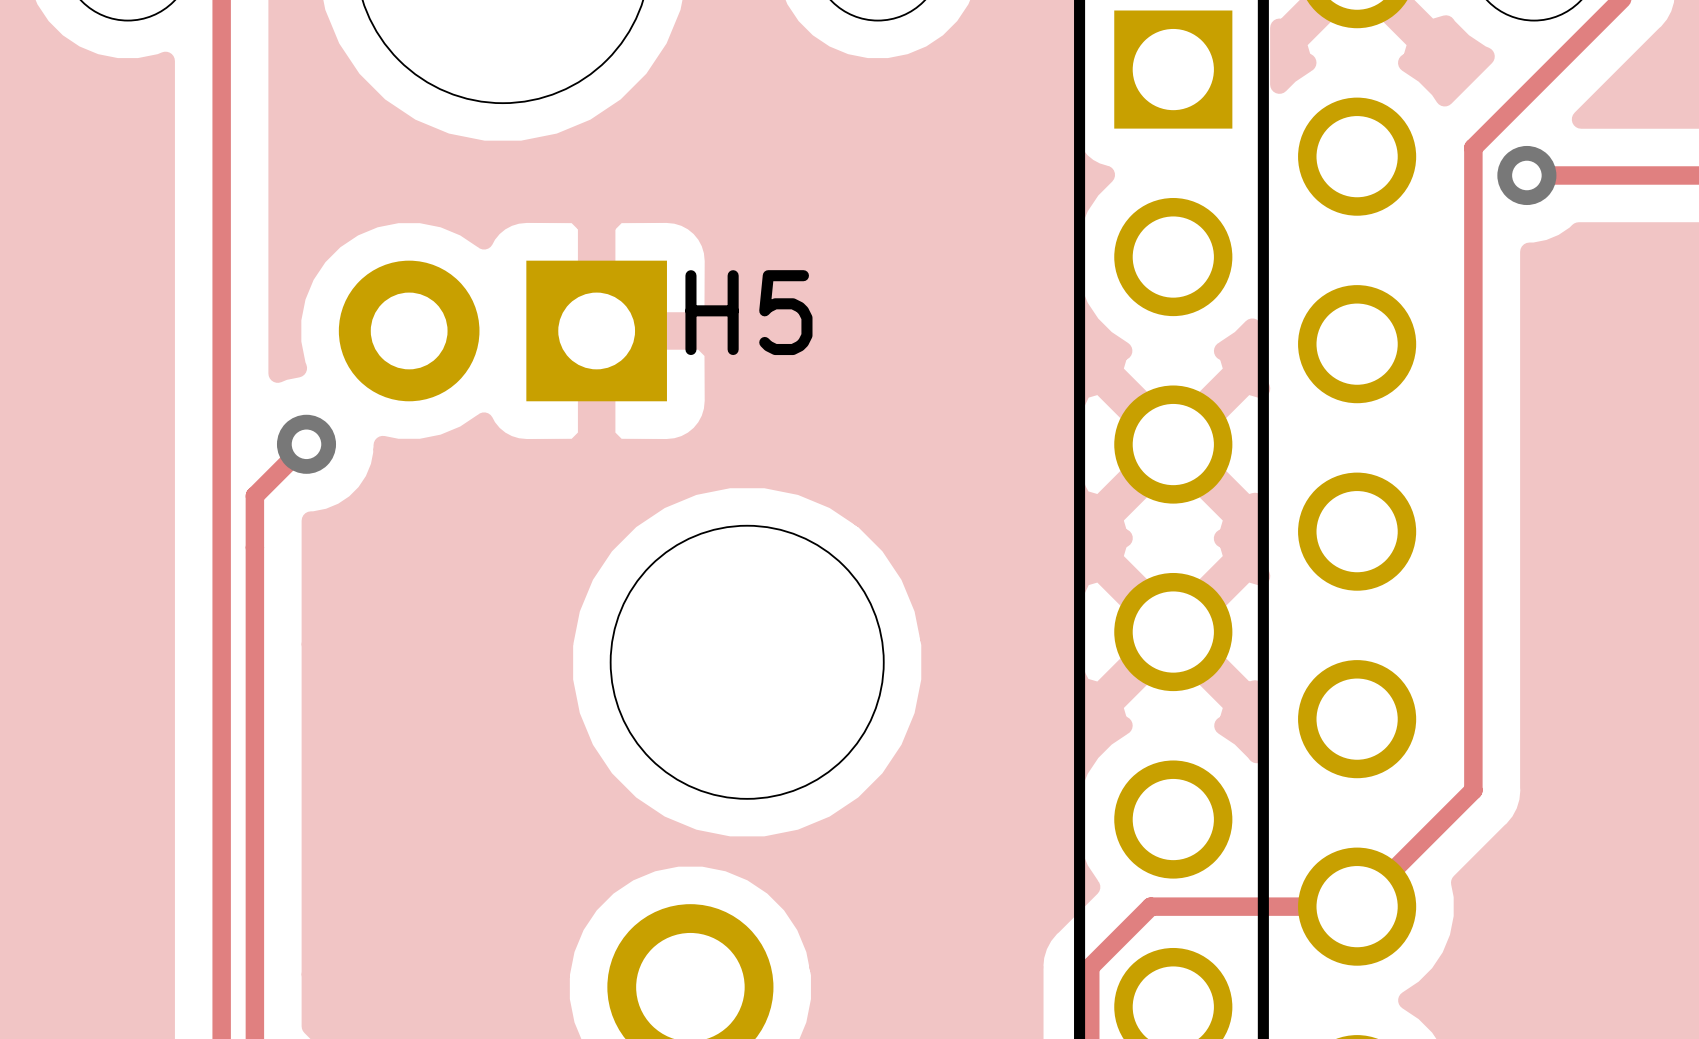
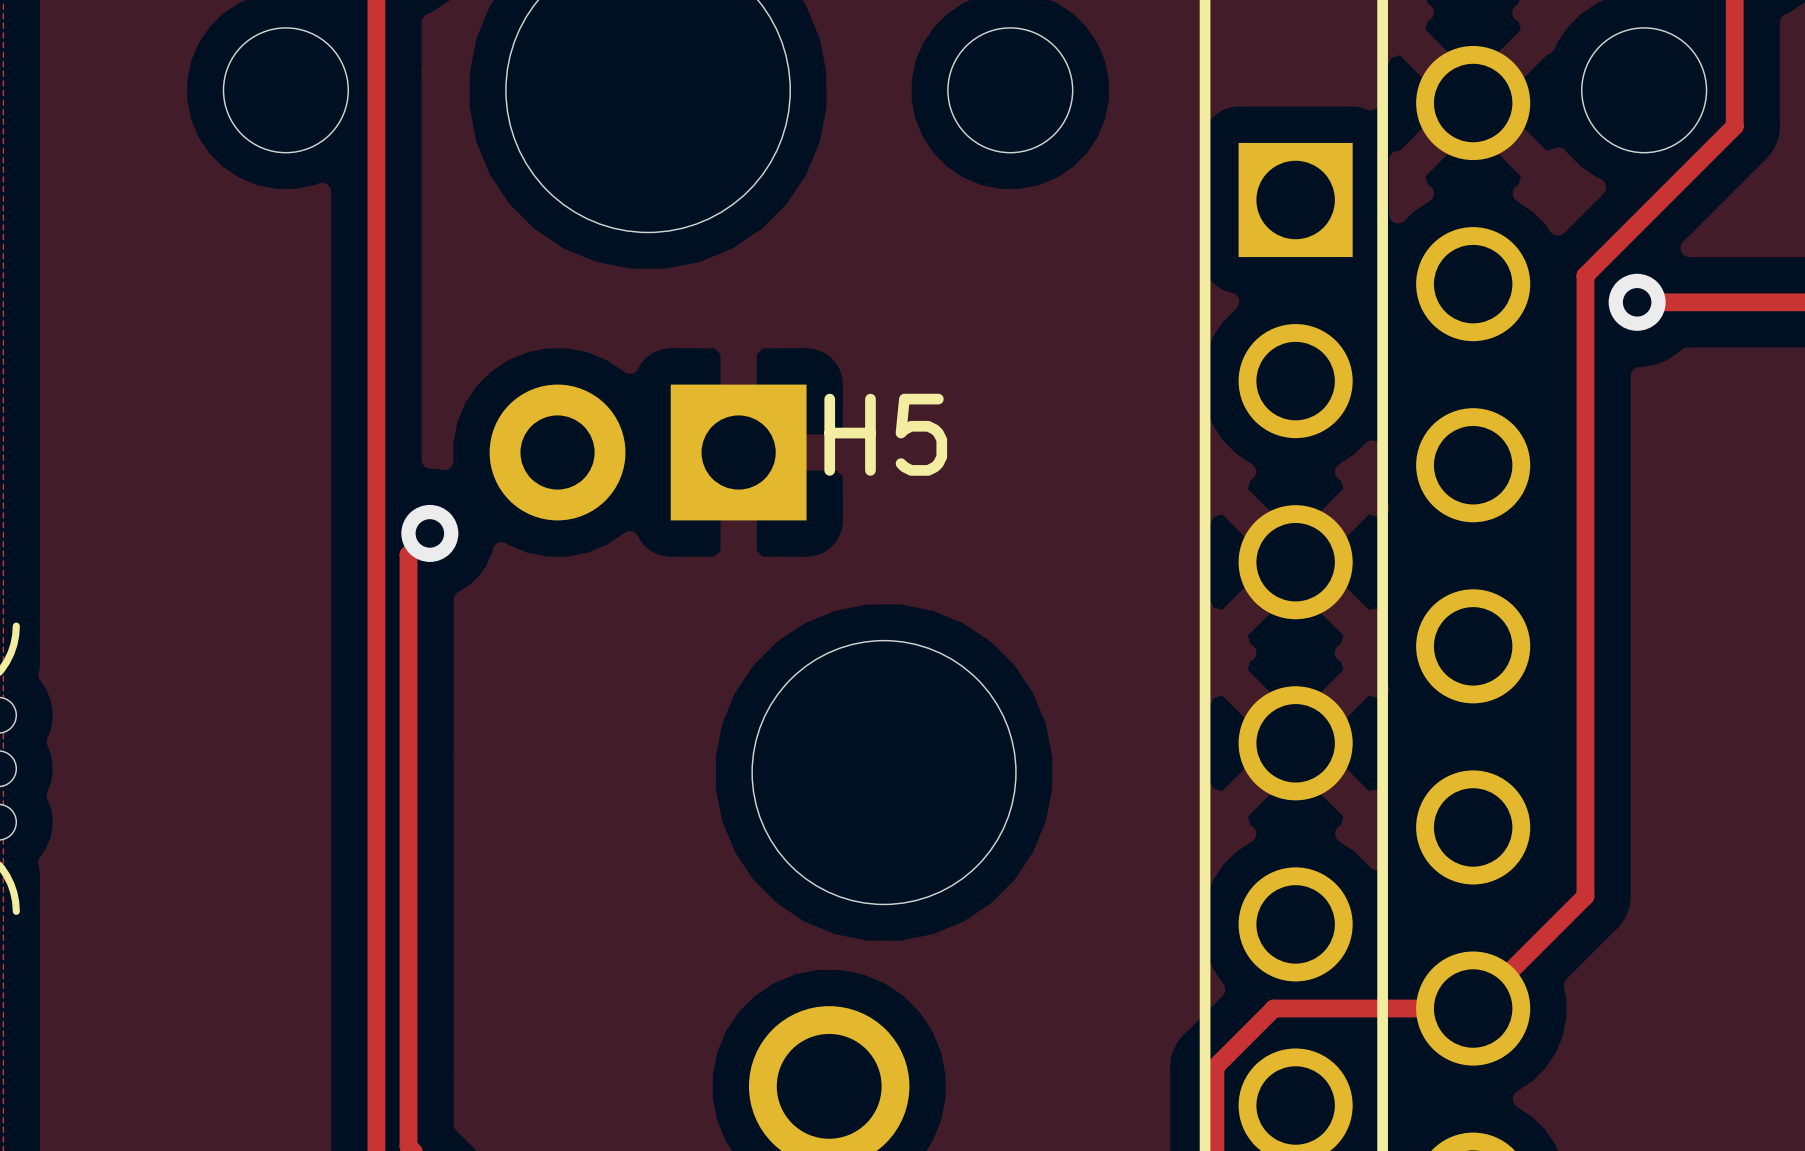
track: (306, 444) (254, 495) -> (429, 533) (408, 554) (408, 611)
via position: (306, 444) -> (429, 533)

